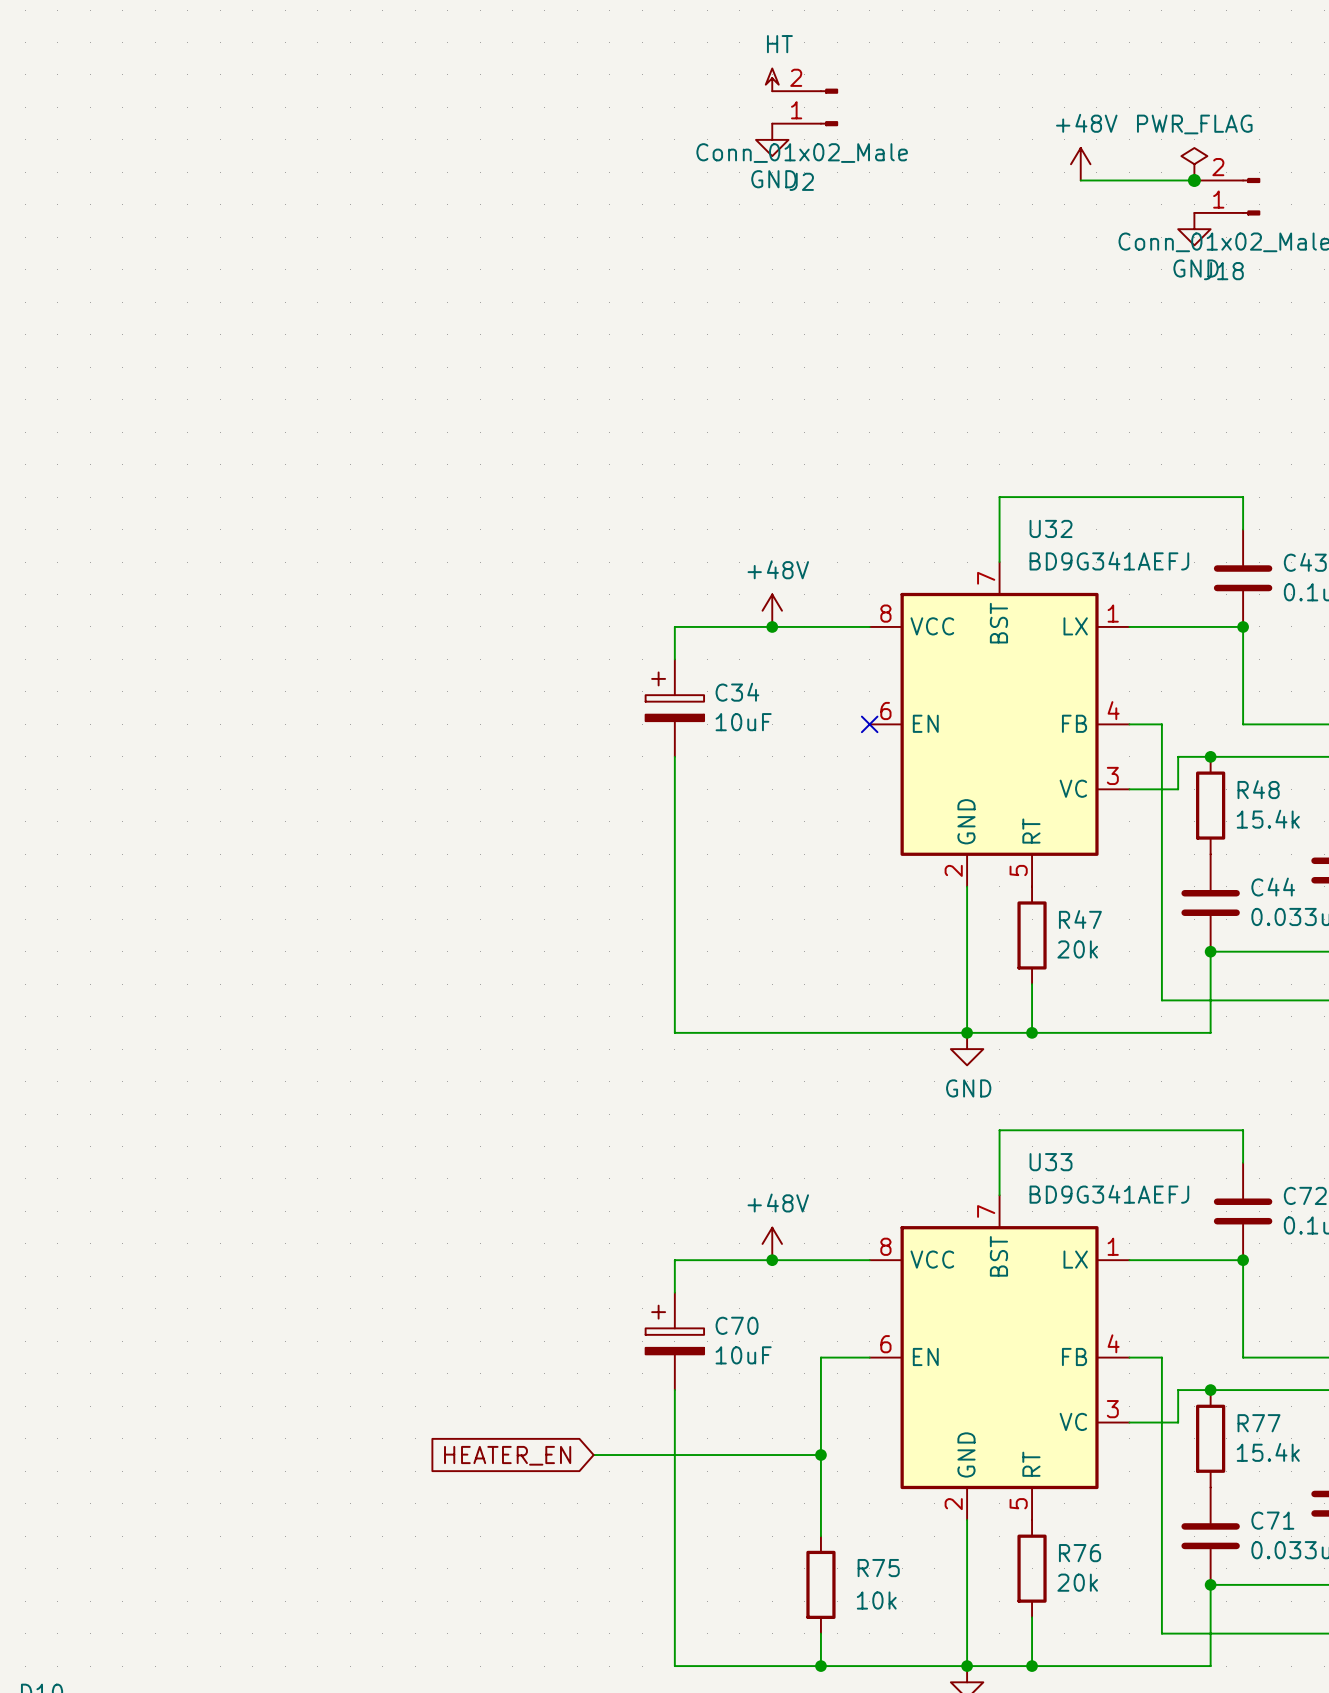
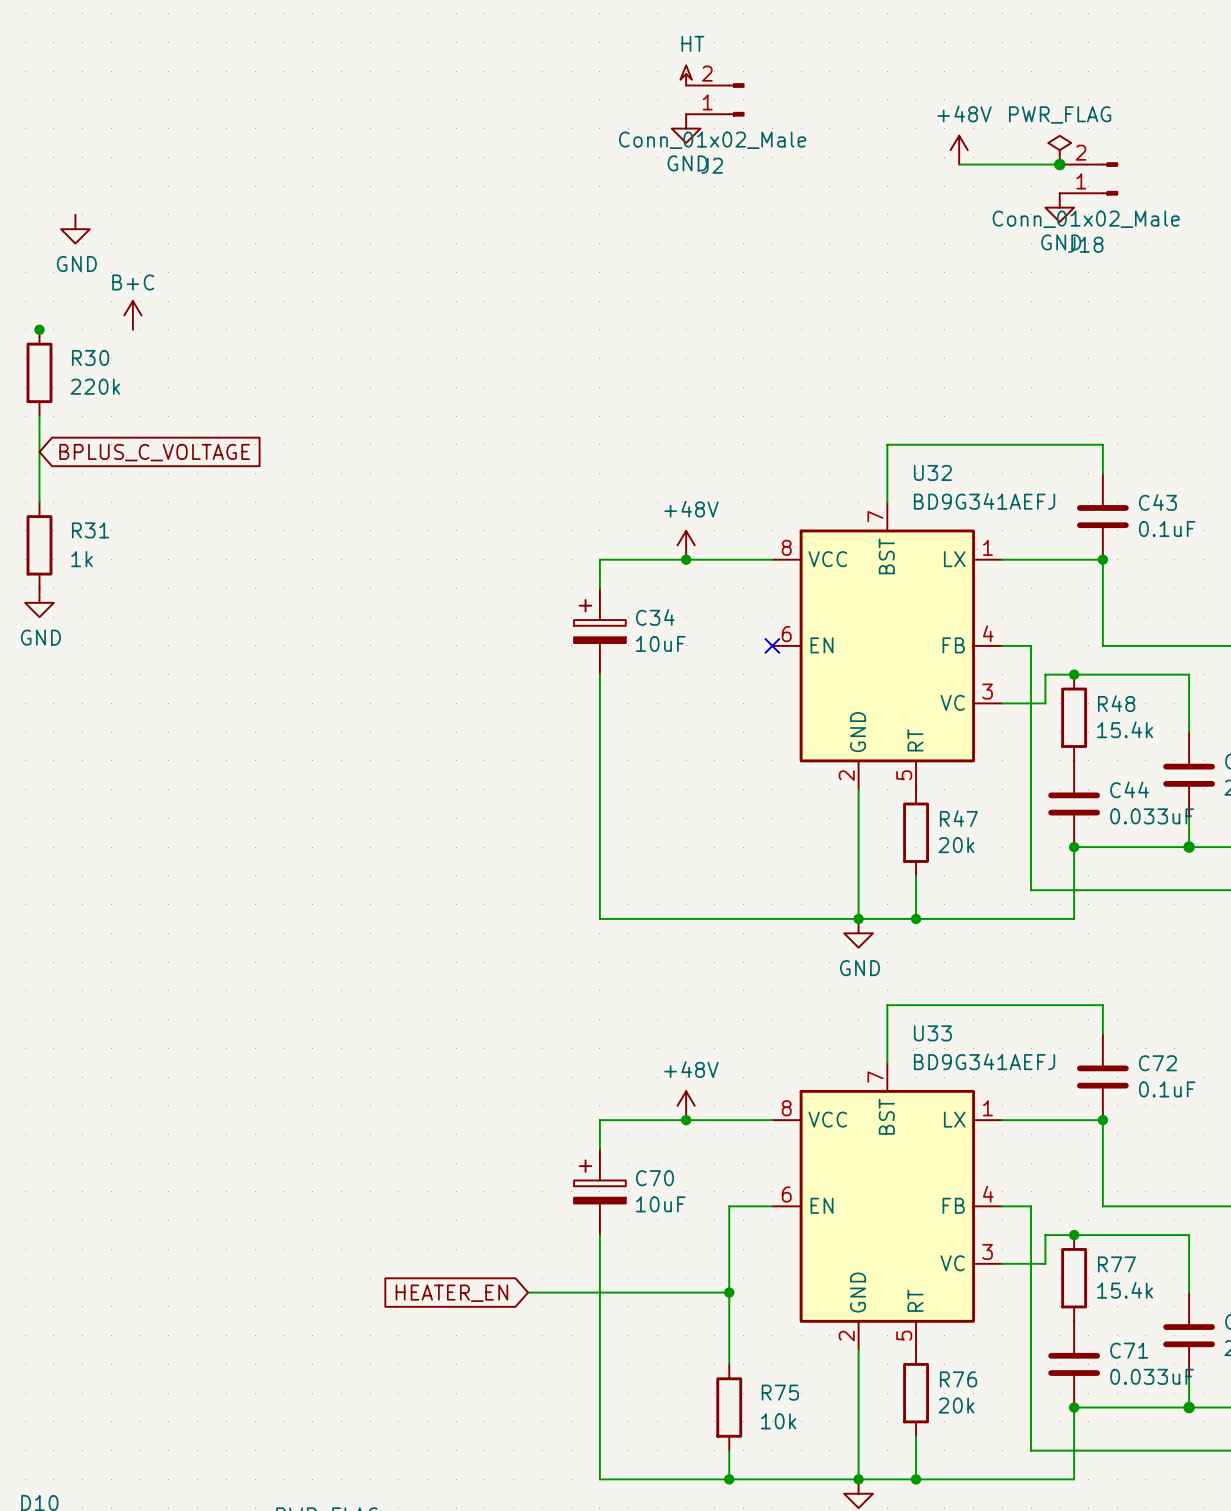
power symbol: none -> GND (75, 229)
power symbol: none -> B+C (132, 315)
junction: none -> (39, 329)
R30: none -> 220k (39, 372)
wire: none -> (39, 416) (39, 502)
global label: none -> BPLUS_C_VOLTAGE (154, 452)
R31: none -> 1k (39, 545)
power symbol: none -> GND (39, 602)

